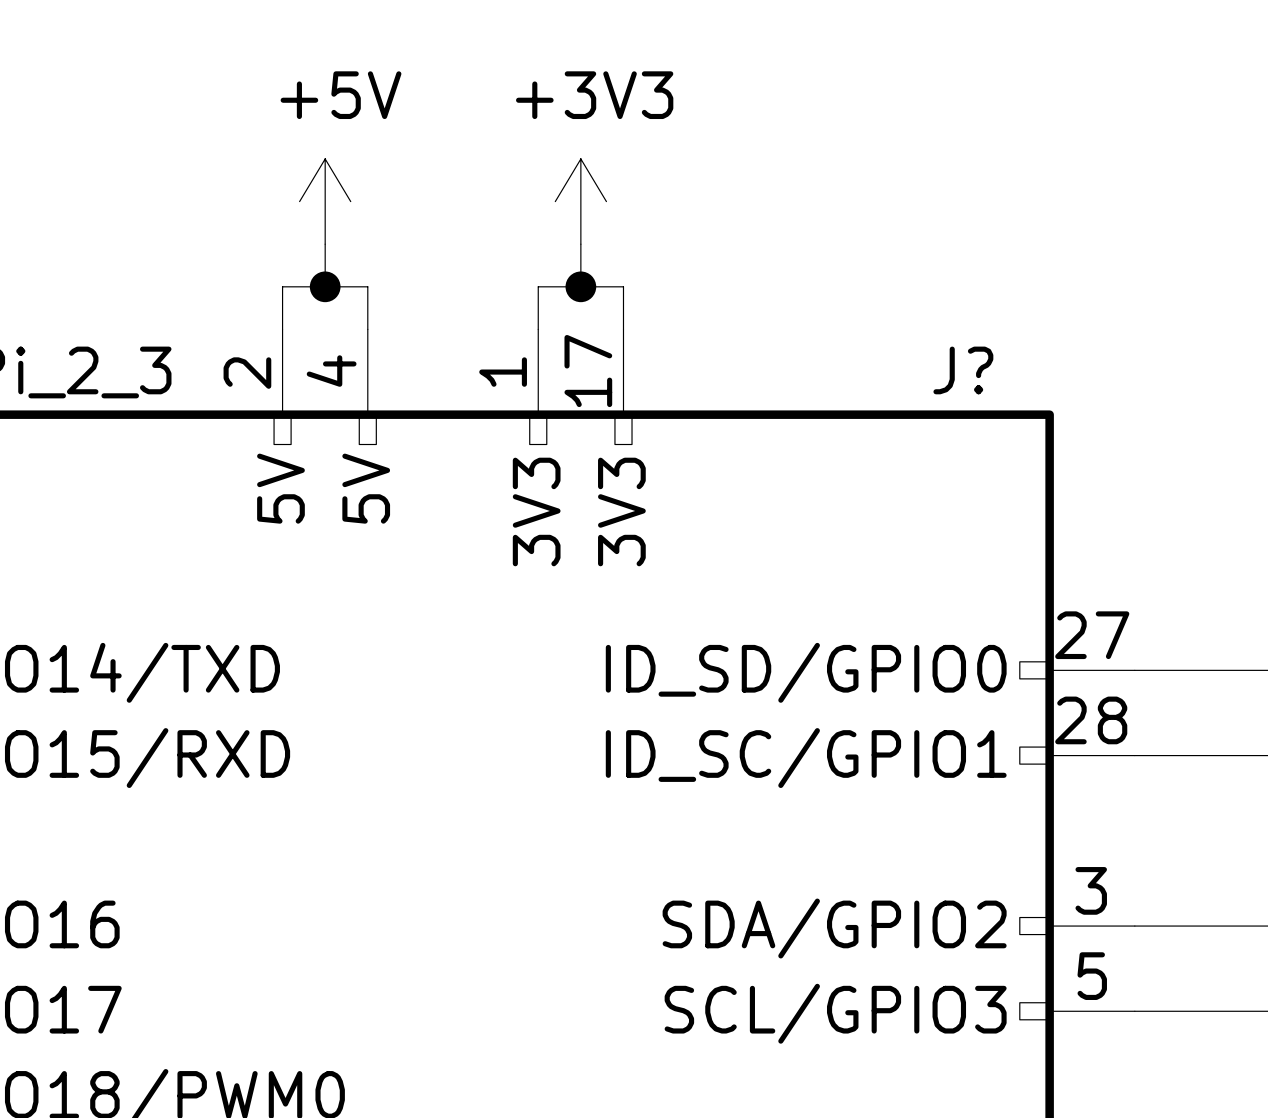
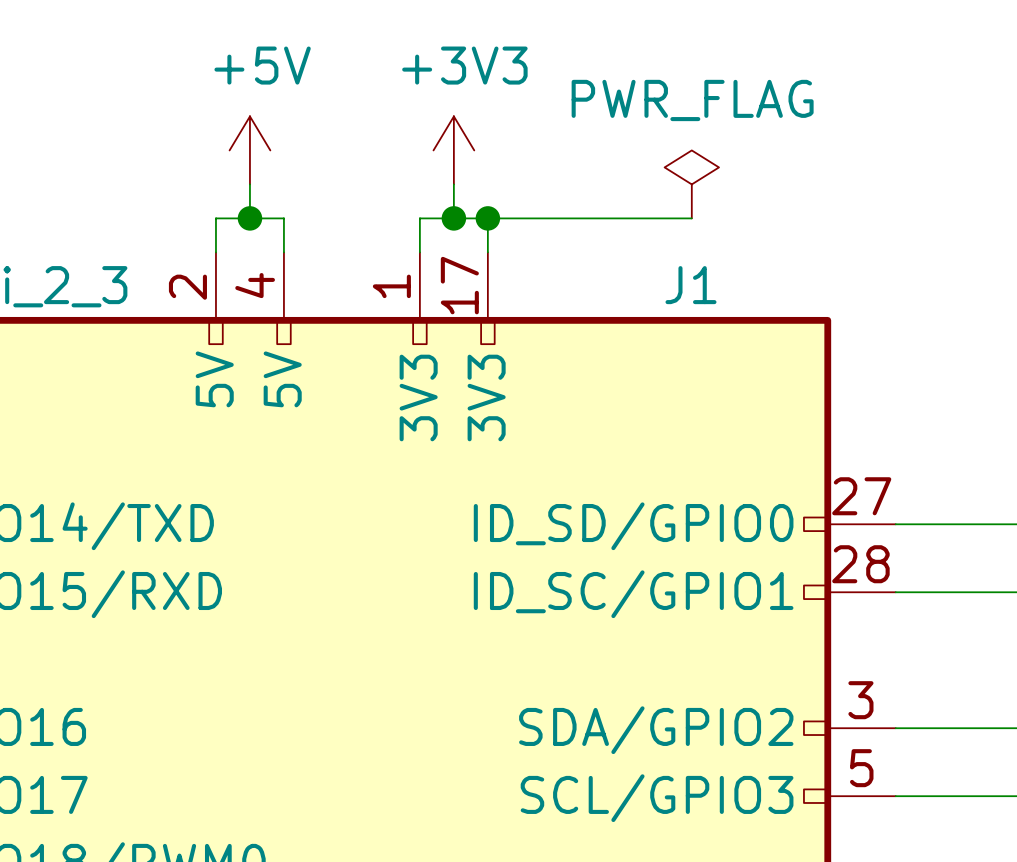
power symbol: none -> PWR_FLAG (691, 184)
wire: none -> (487, 218) (691, 218)
junction: none -> (487, 218)
J? name: J? (963, 370) -> J1 (691, 285)

